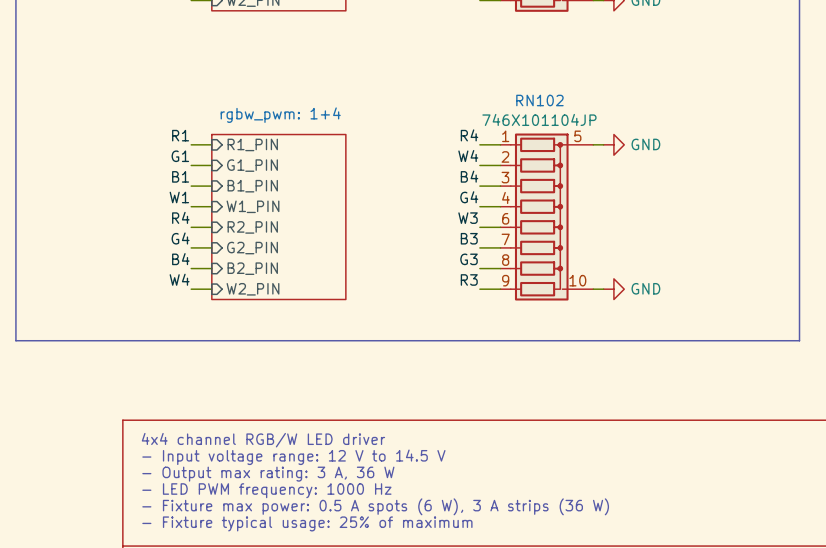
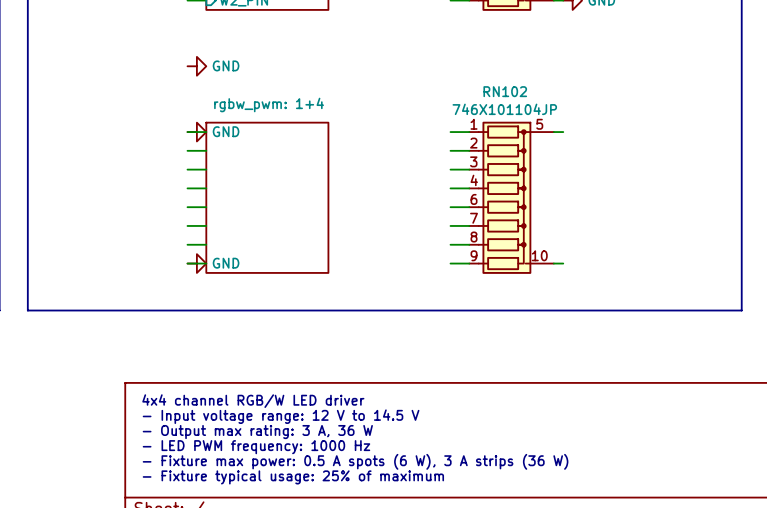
power symbol: none -> GND (196, 66)
label: R1 (180, 135) -> none
label: R4 (469, 135) -> none
power symbol: none -> GND (196, 132)
sheet pin: R1_PIN (252, 144) -> none
power symbol: GND (613, 144) -> none
label: G1 (180, 156) -> none
label: W4 (468, 156) -> none
sheet pin: G1_PIN (252, 165) -> none
label: B1 (180, 176) -> none
label: B4 (469, 176) -> none
sheet pin: B1_PIN (252, 186) -> none
label: W1 (179, 197) -> none
label: G4 (469, 197) -> none
sheet pin: W1_PIN (252, 206) -> none
label: R4 (180, 217) -> none
label: W3 (468, 218) -> none
sheet pin: R2_PIN (252, 227) -> none
label: G4 (180, 238) -> none
label: B3 (469, 238) -> none
sheet pin: G2_PIN (252, 248) -> none
label: B4 (180, 259) -> none
label: G3 (469, 259) -> none
sheet pin: B2_PIN (252, 268) -> none
label: W4 (179, 279) -> none
label: R3 (469, 279) -> none
power symbol: none -> GND (196, 263)
sheet pin: W2_PIN (252, 289) -> none
power symbol: GND (613, 289) -> none

